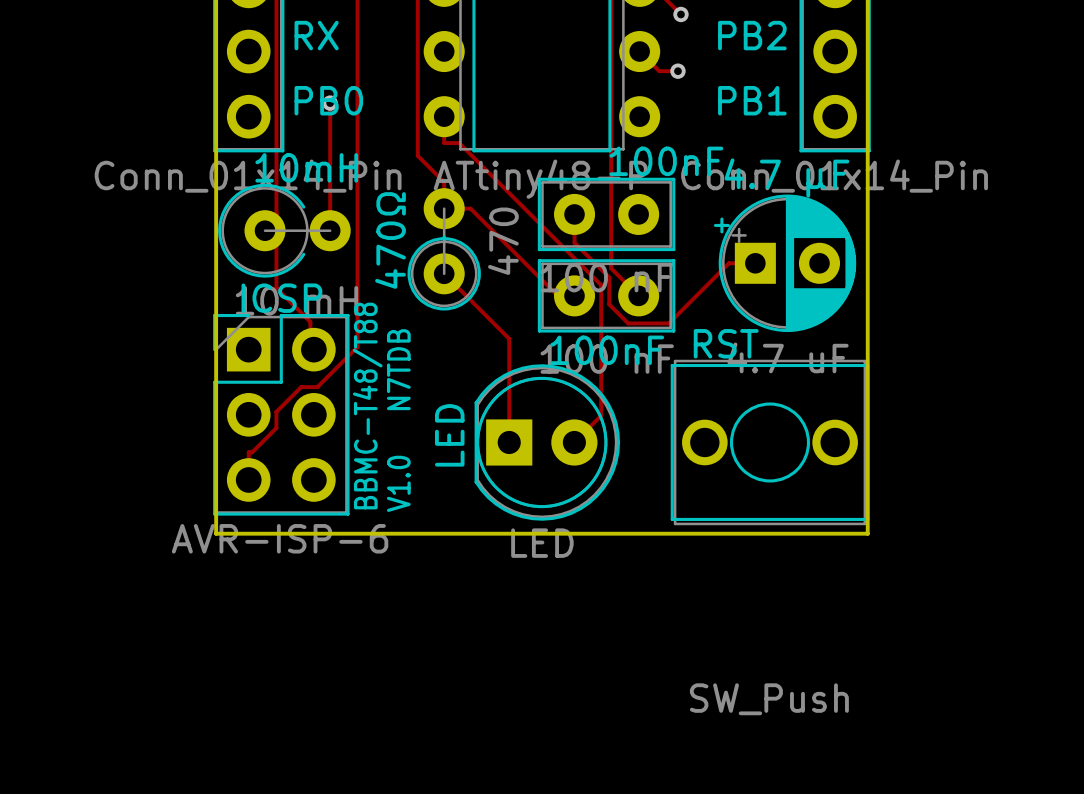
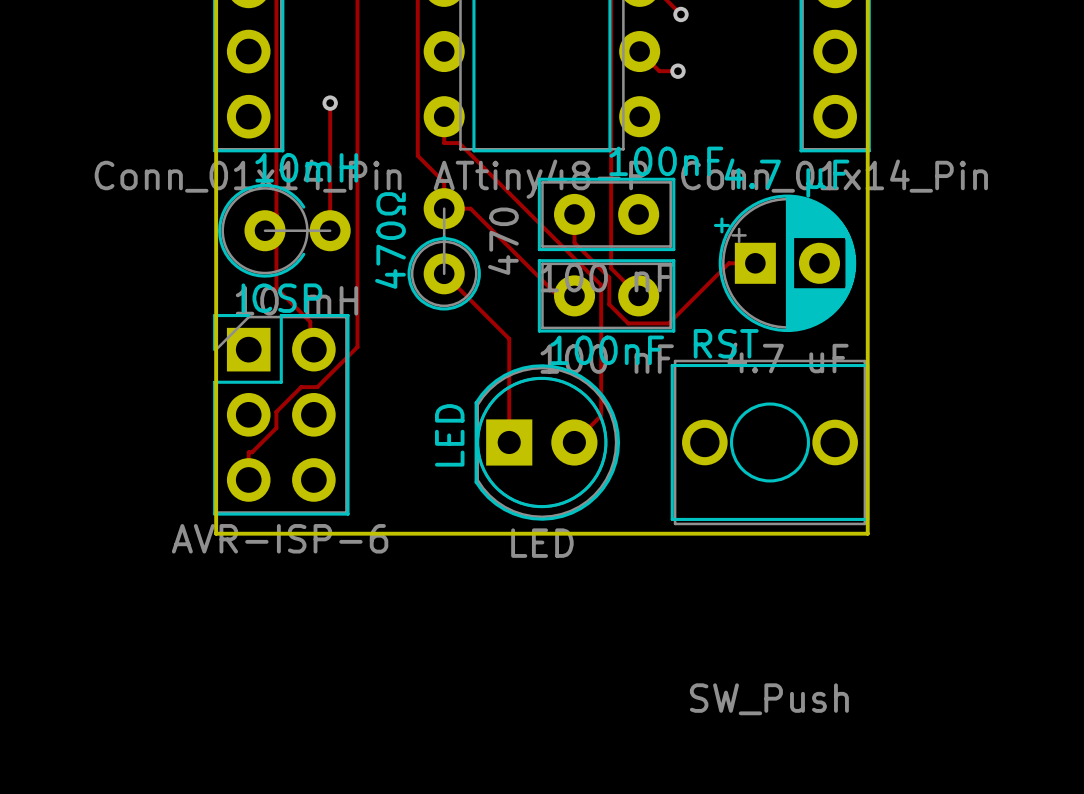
text: RX (316, 35) -> none
text: PB2 (752, 35) -> none
text: PB0 (328, 100) -> none
text: PB1 (752, 100) -> none
text: BBMC-T48/T88 (367, 406) -> none
text: V1.0 N7TDB (398, 420) -> none

